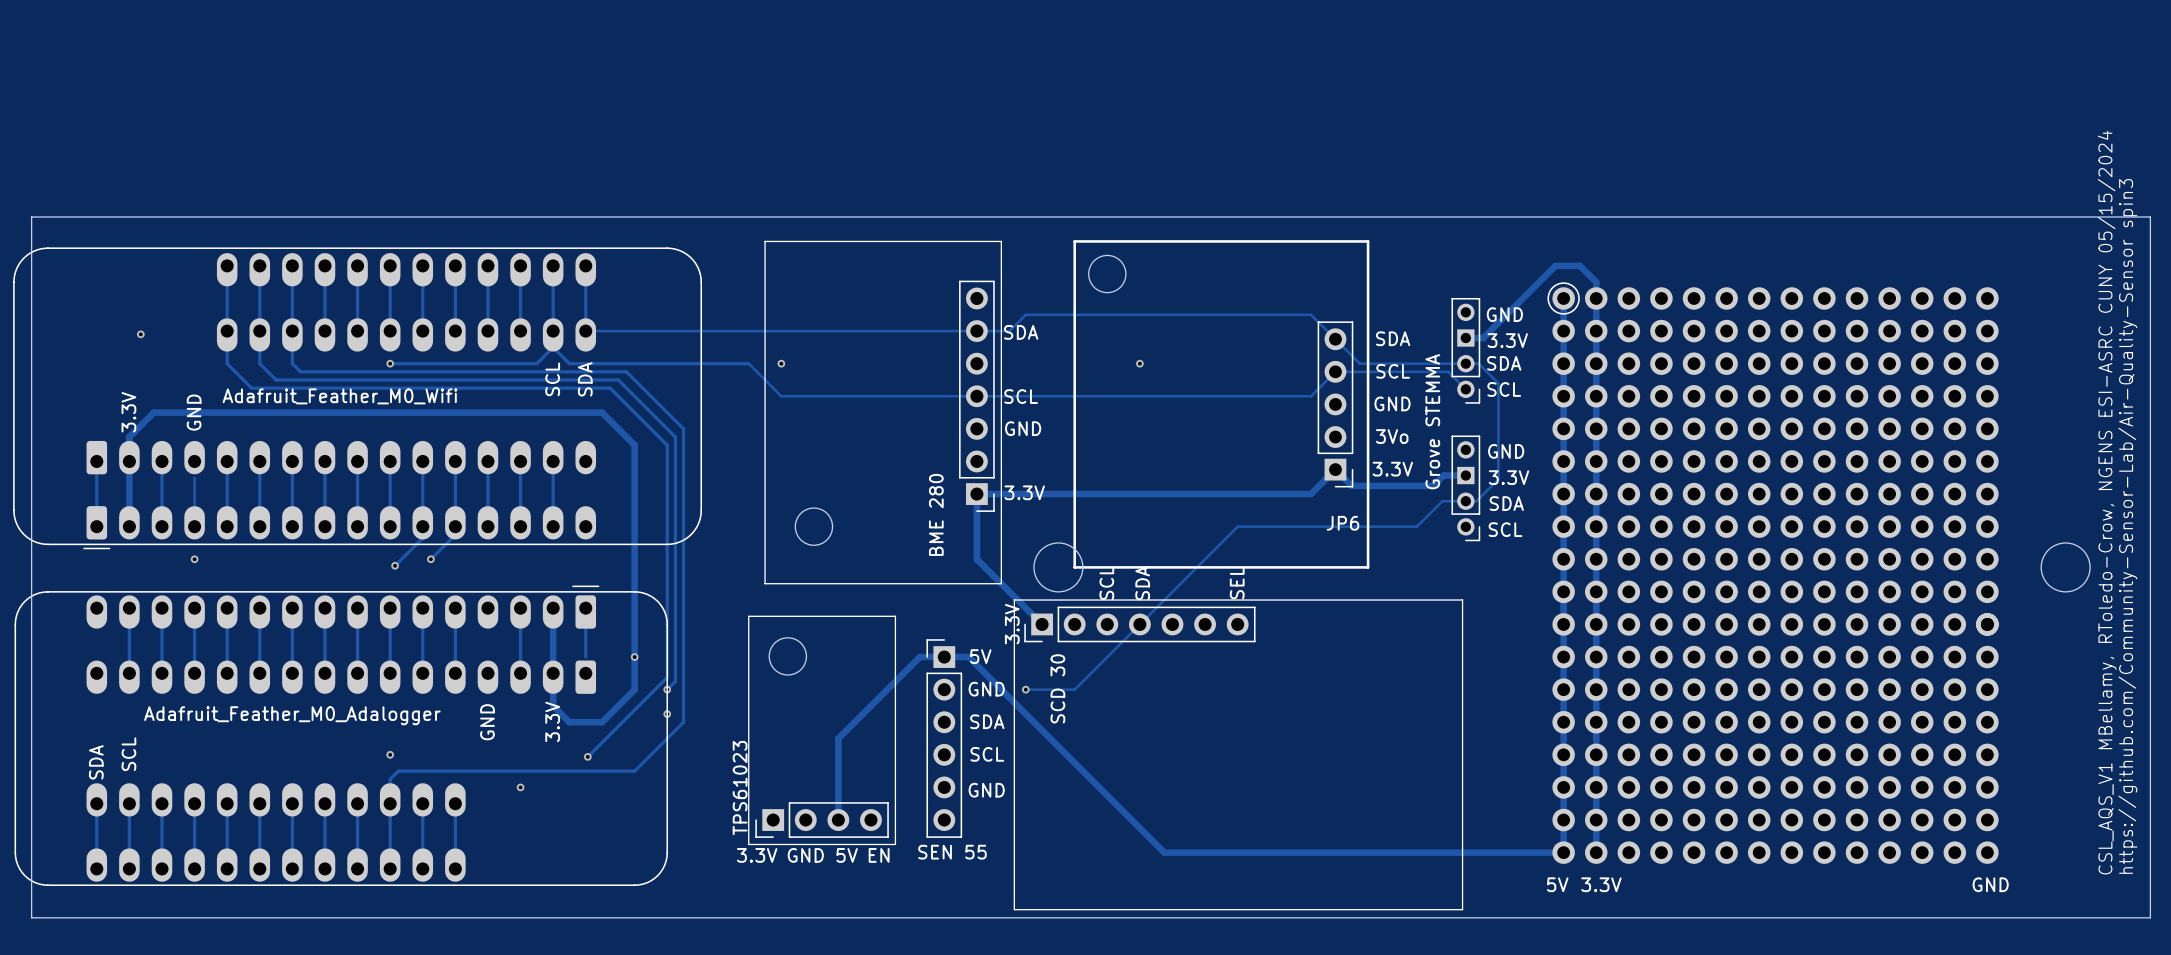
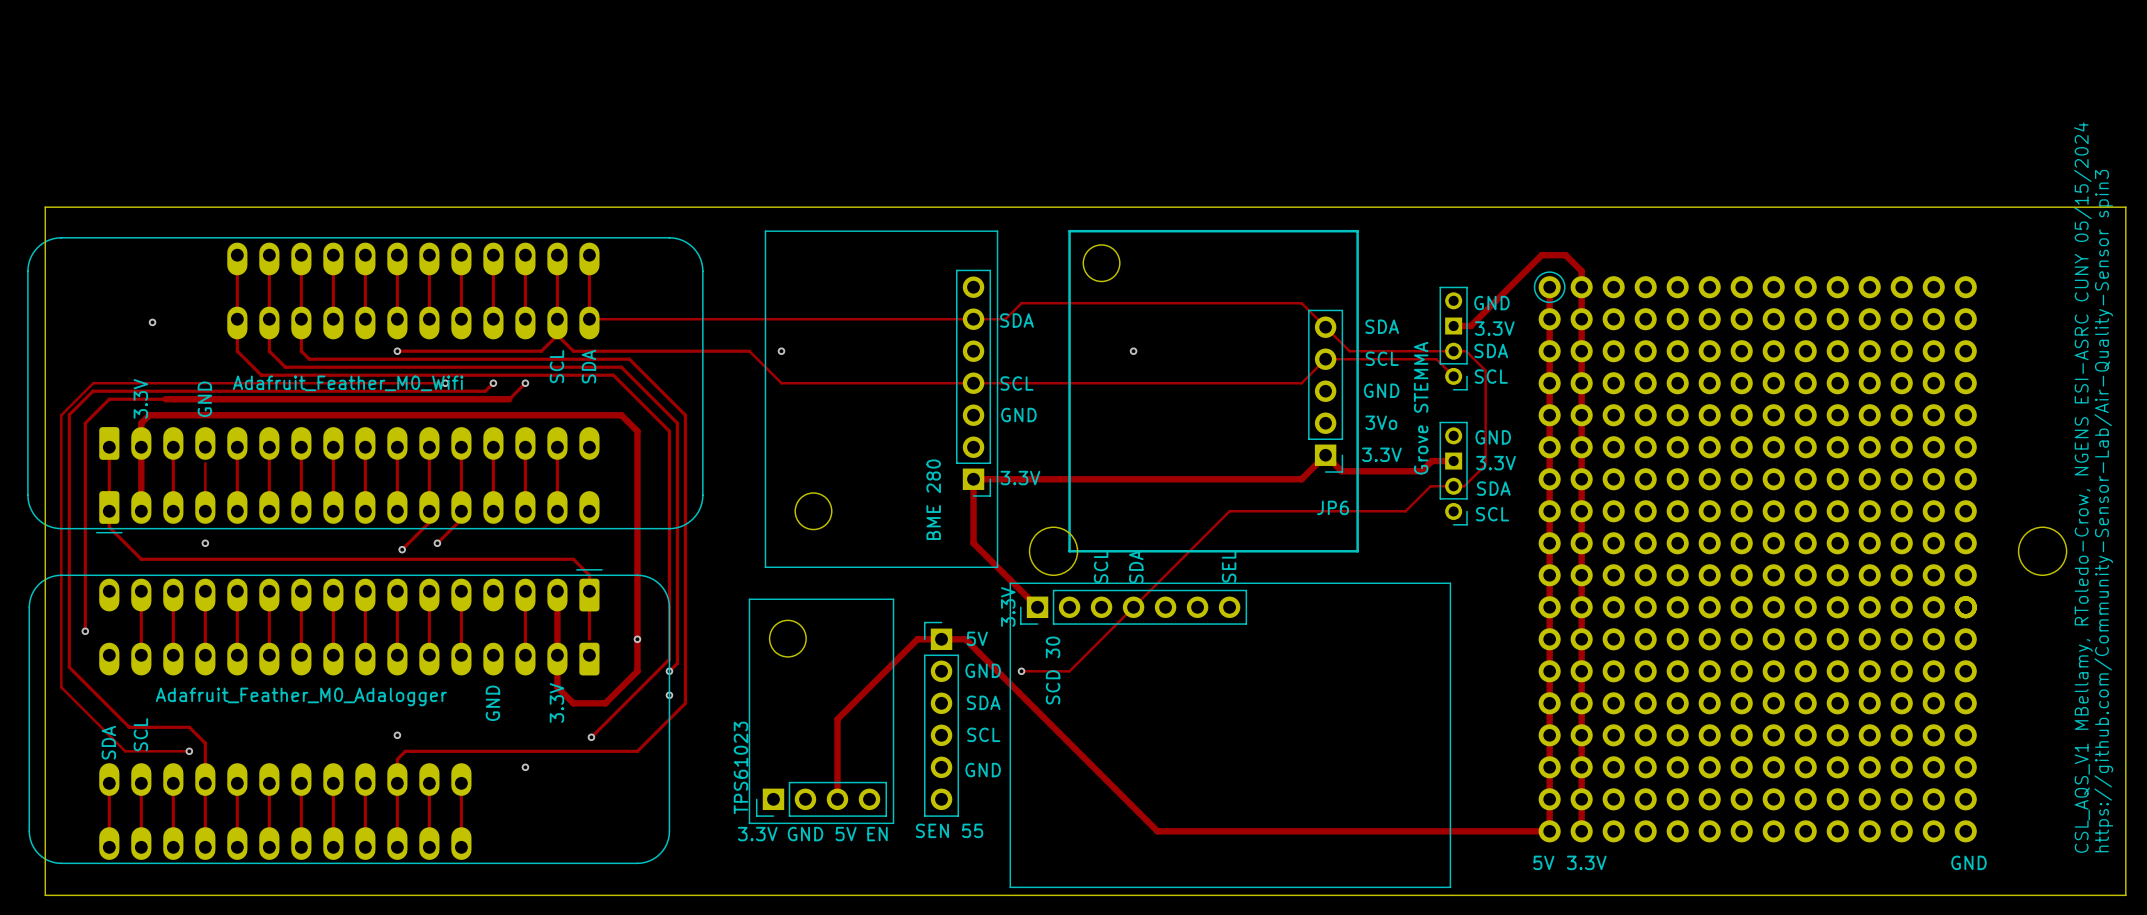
track: none -> (445, 383) (93, 383) (61, 415) (61, 687) (125, 751) (189, 751)
via: none -> (445, 383)
track: none -> (493, 383) (485, 391) (92, 391) (69, 414) (69, 667) (129, 727) (189, 727) (205, 743) (205, 783)
via: none -> (493, 383)
via: none -> (525, 383)
track: (153, 412) (137, 428) -> (165, 399) (109, 399) (85, 423) (85, 631)
track: (504, 412) (602, 412) (618, 428) -> (509, 399) (525, 383)
track: none -> (149, 415) (621, 415)
track: none -> (109, 511) (109, 527) (141, 559) (573, 559) (589, 575) (589, 591)
via: none -> (85, 631)
via: none -> (189, 751)

